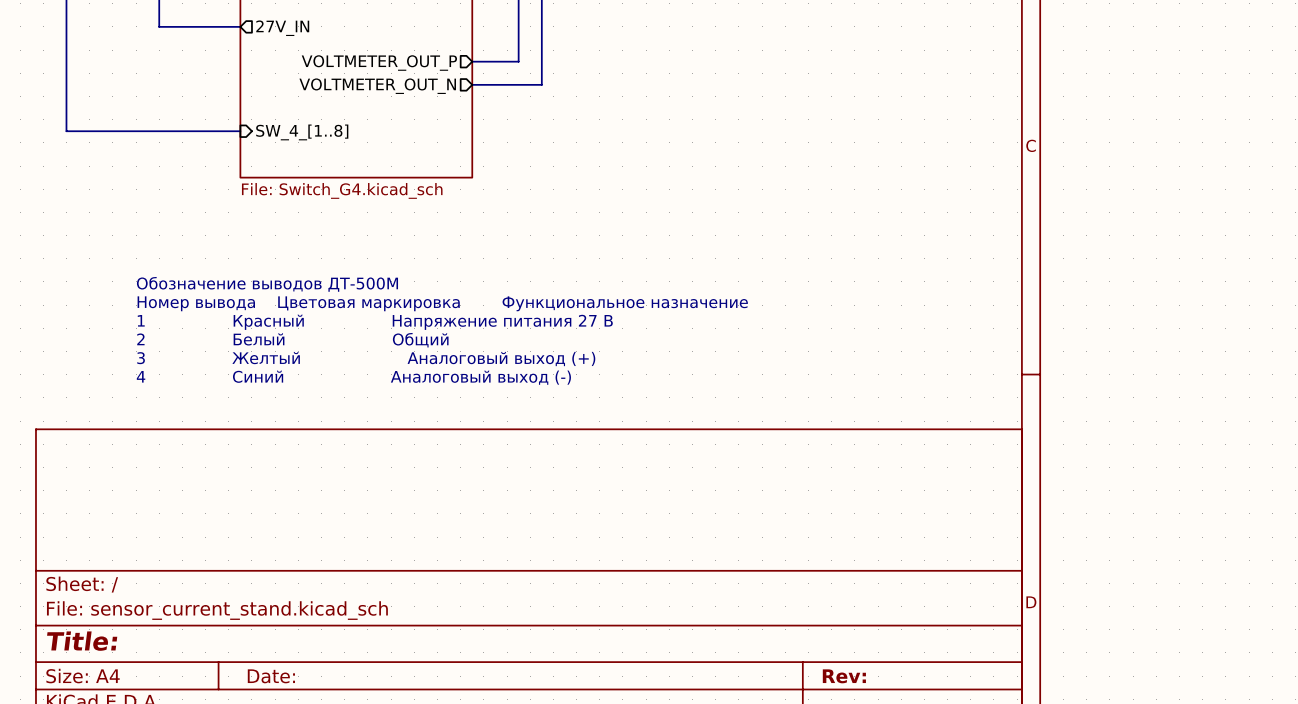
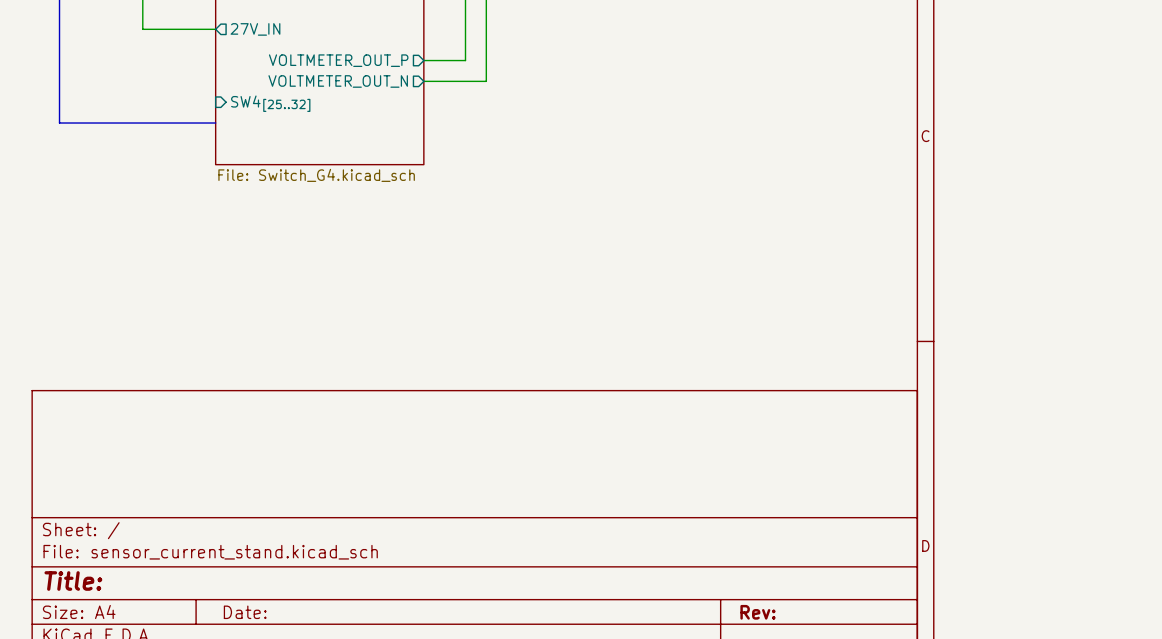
sheet pin: SW_4_[1..8] (302, 132) -> SW4[25..32] (270, 103)
text: Обозначение выводов ДТ-500М (267, 284) -> none
text: Номер вывода Цветовая маркировка Функциональное назначение (442, 303) -> none
text: 1 Красный Напряжение питания 27 В (375, 322) -> none
text: 2 Белый Общий (292, 340) -> none
text: 3 Желтый Аналоговый выход (+) (366, 359) -> none
text: 4 Синий Аналоговый выход (-) (353, 377) -> none

